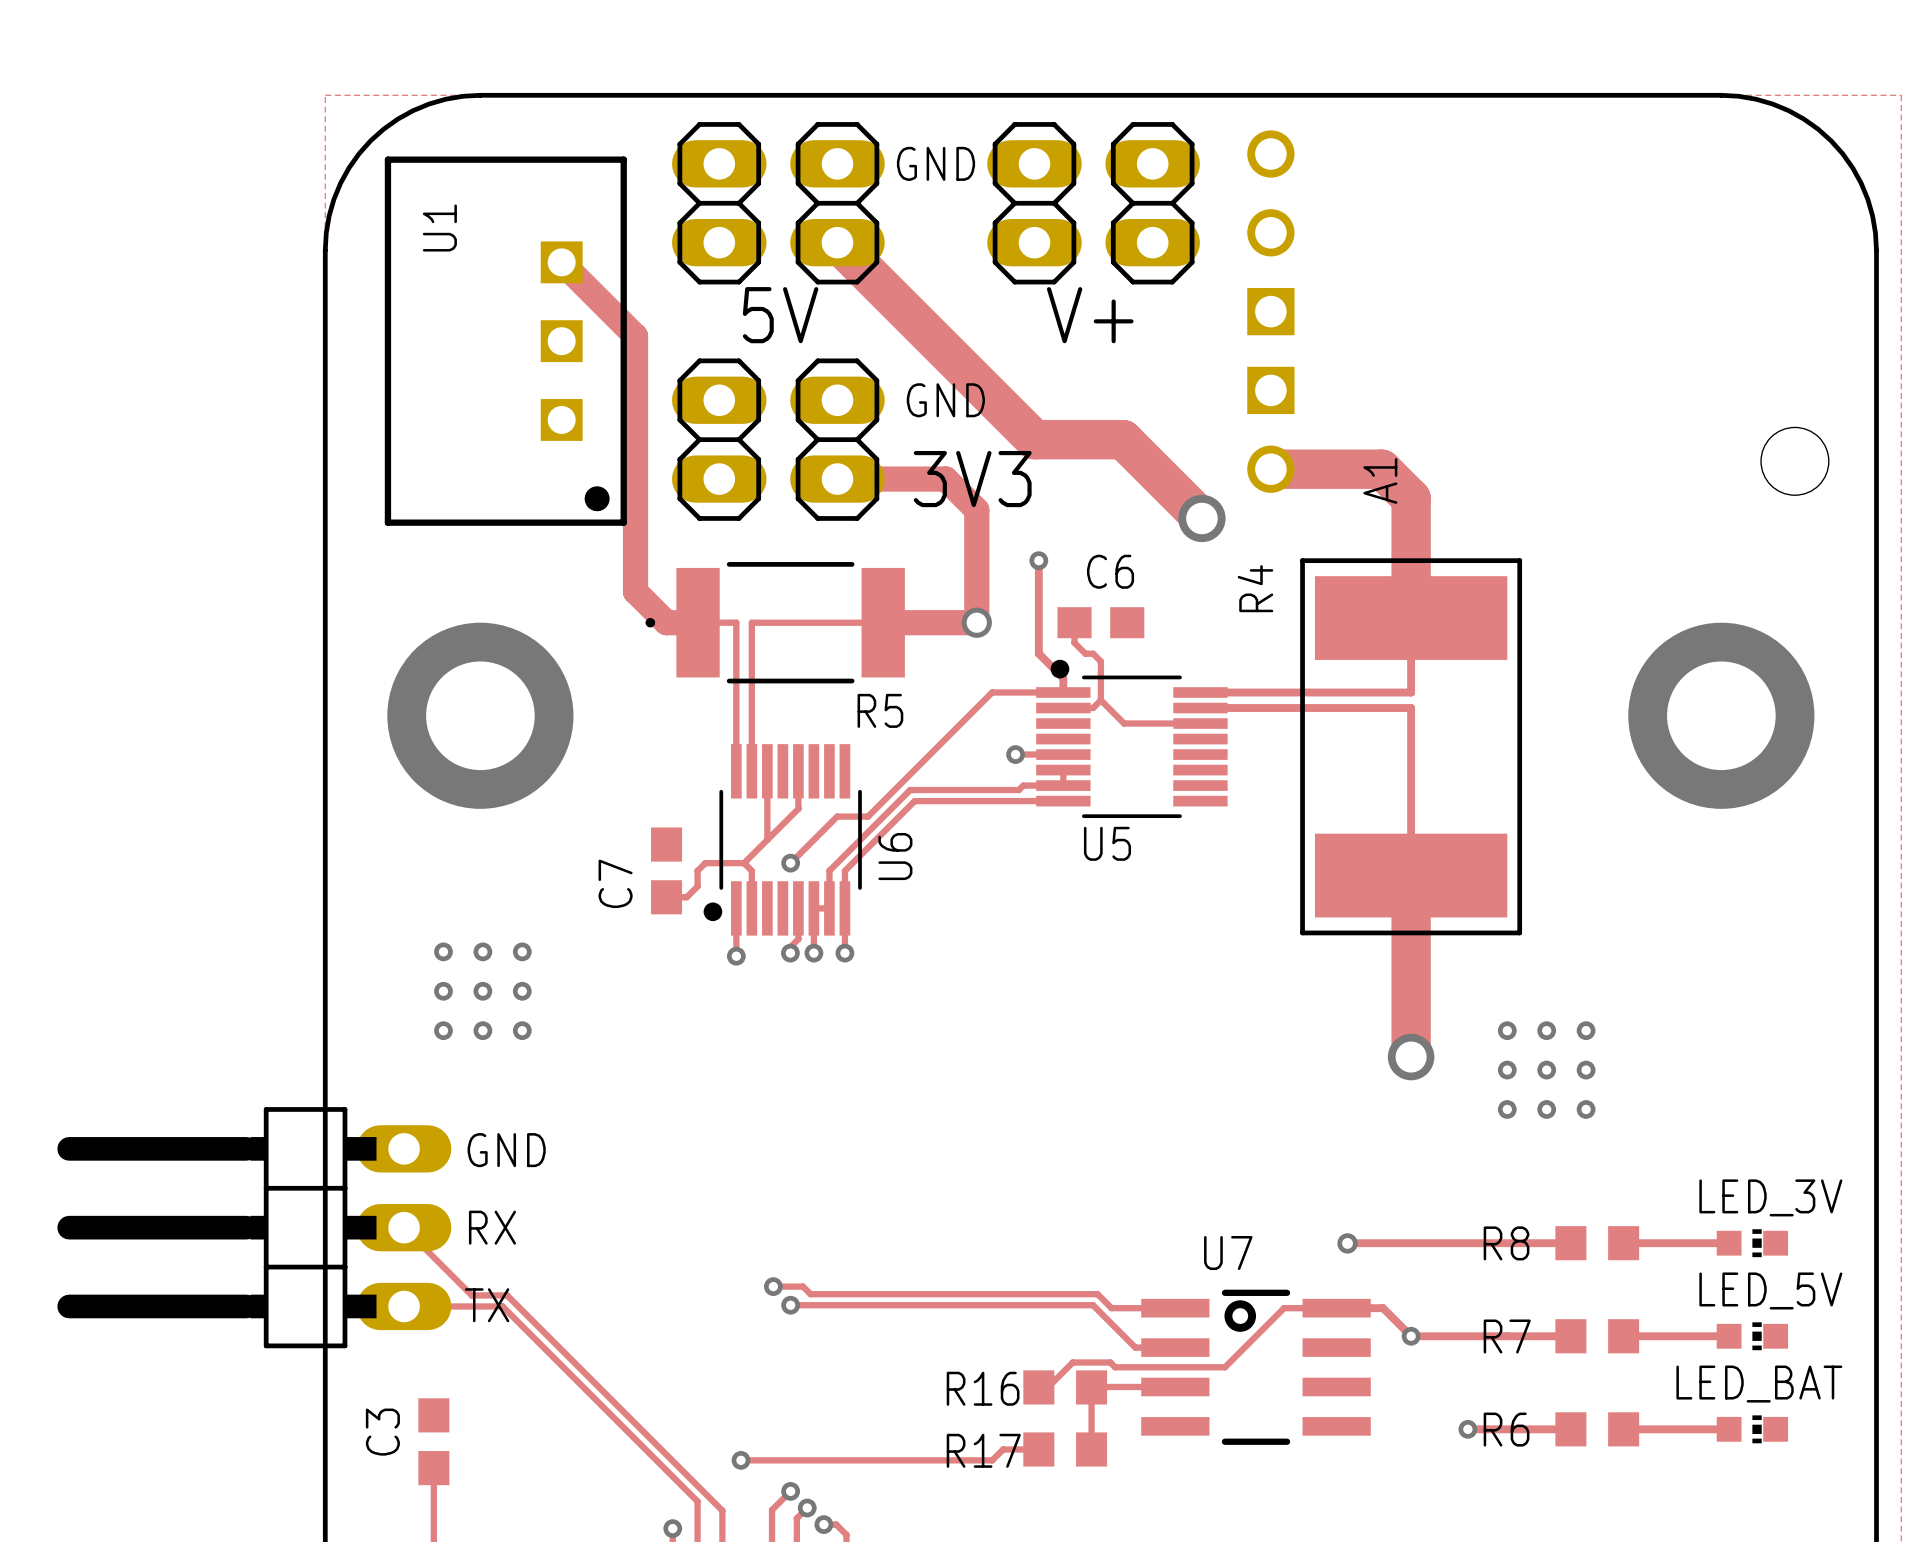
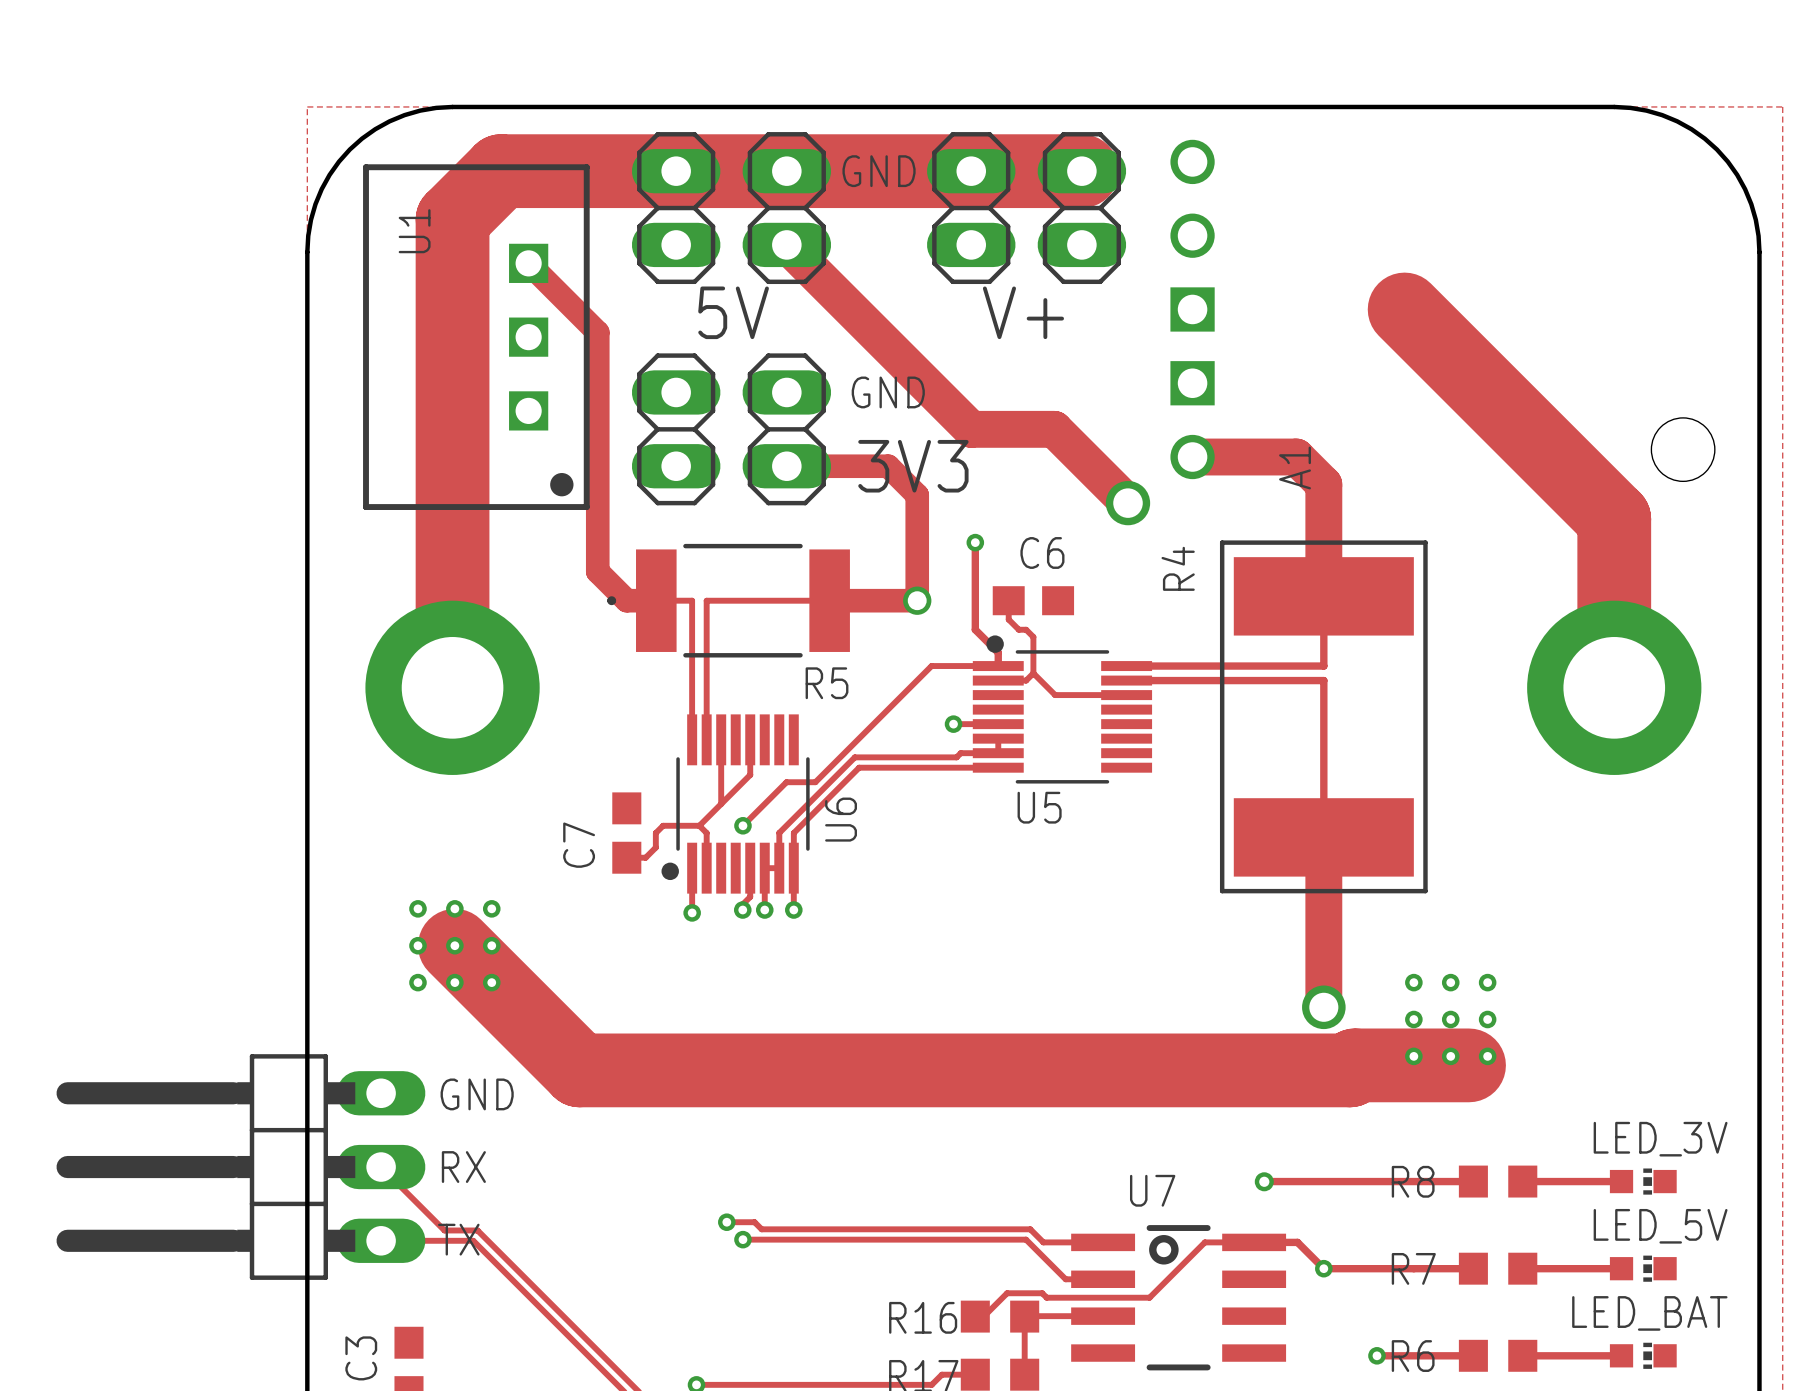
track: none -> (1081, 171) (500, 171) (452, 219) (452, 687)
track: none -> (1404, 309) (1614, 519) (1614, 687)
track: none -> (454, 945) (579, 1070) (1349, 1070) (1354, 1065) (1469, 1065)

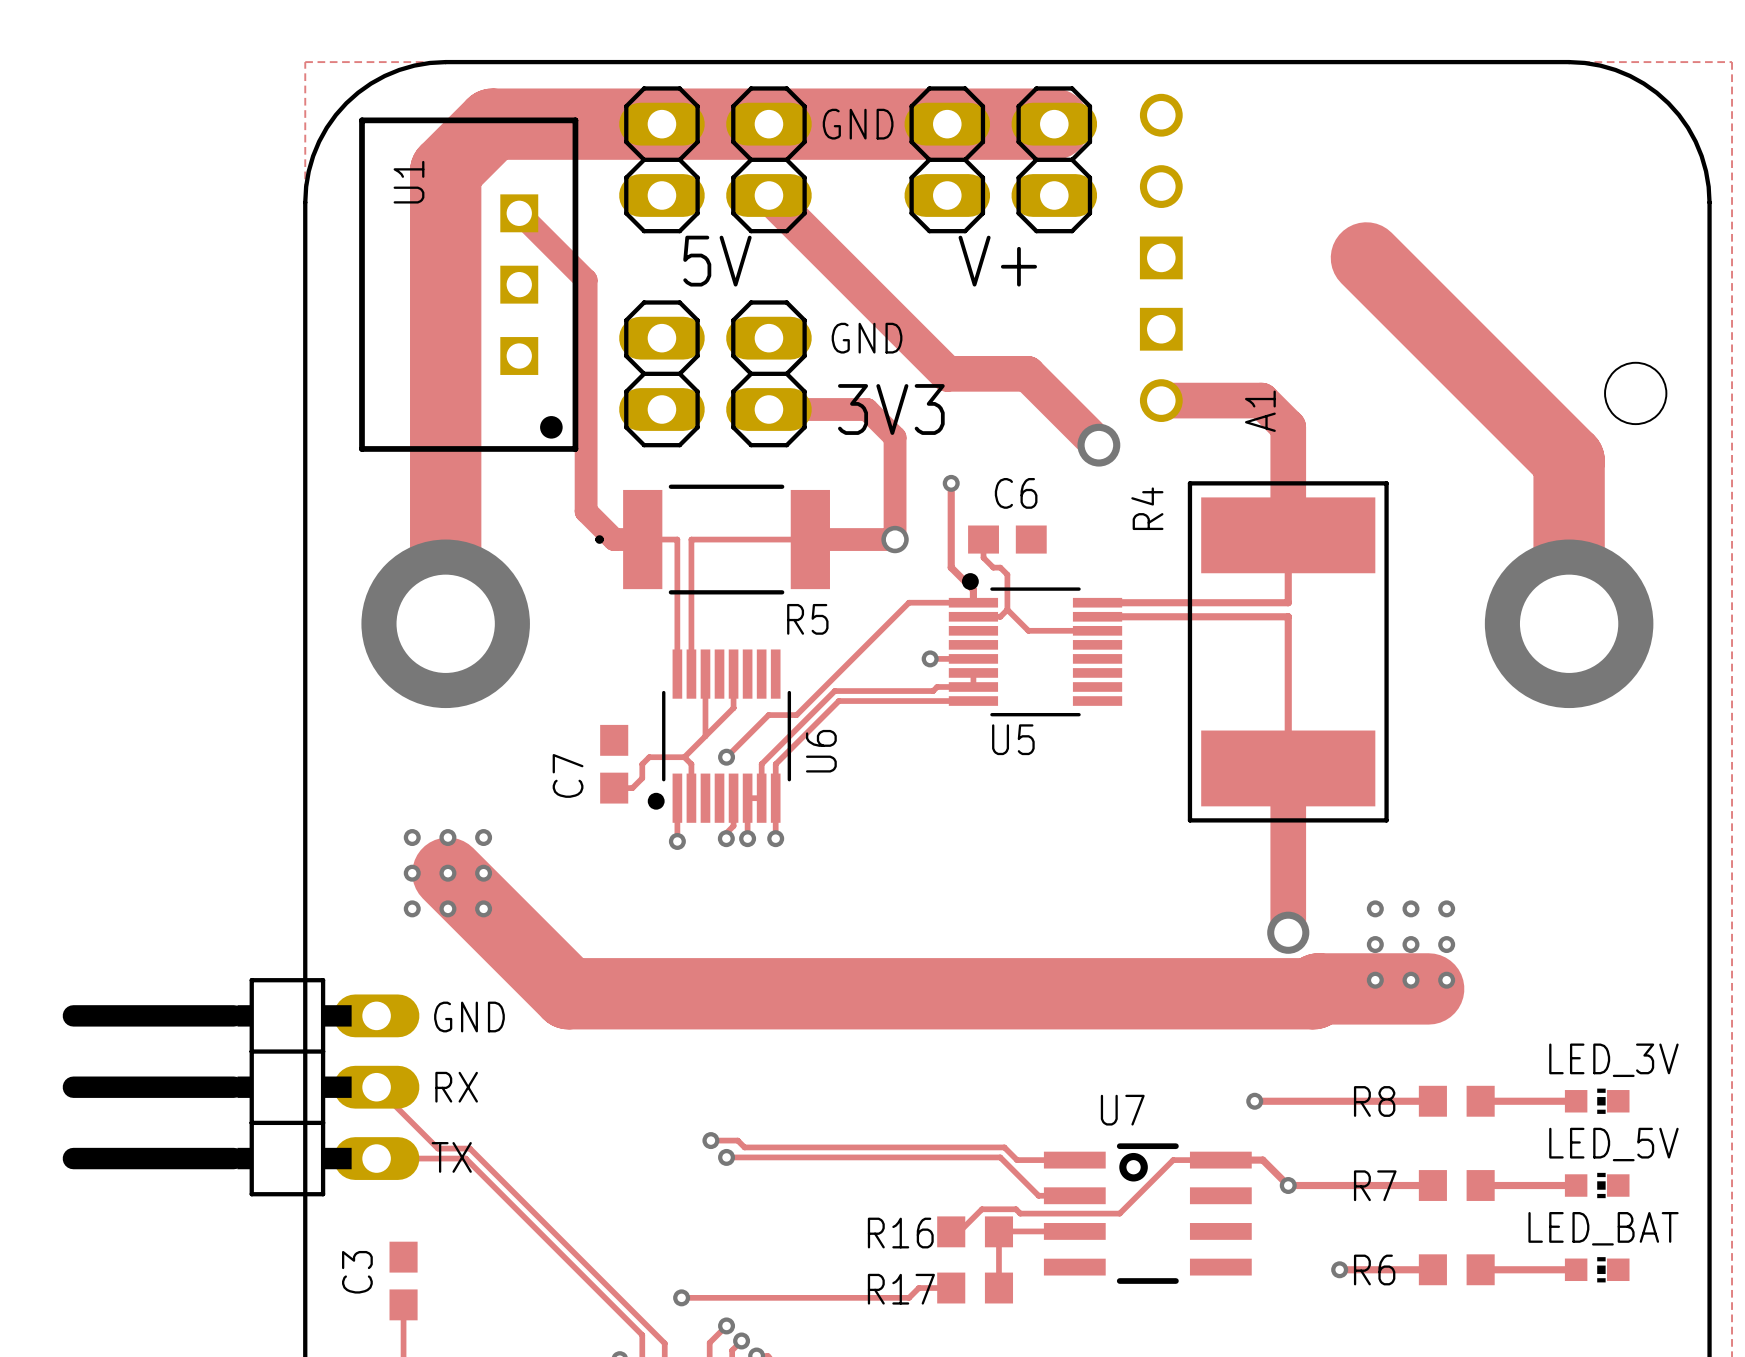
track: (1264, 1181) (1289, 1181) -> none
via: (1264, 1181) -> none
via: none -> (1254, 1101)

